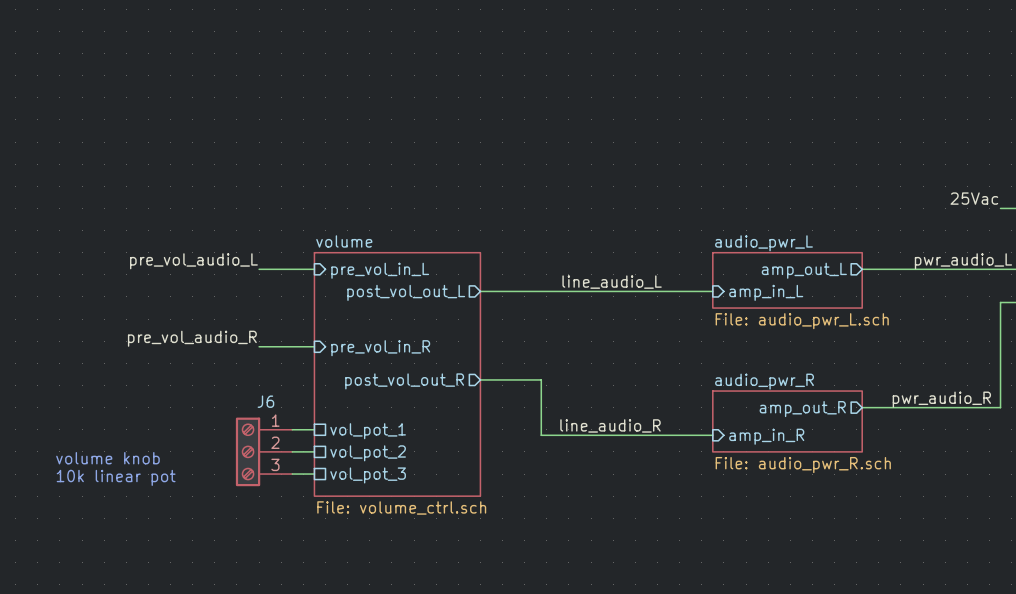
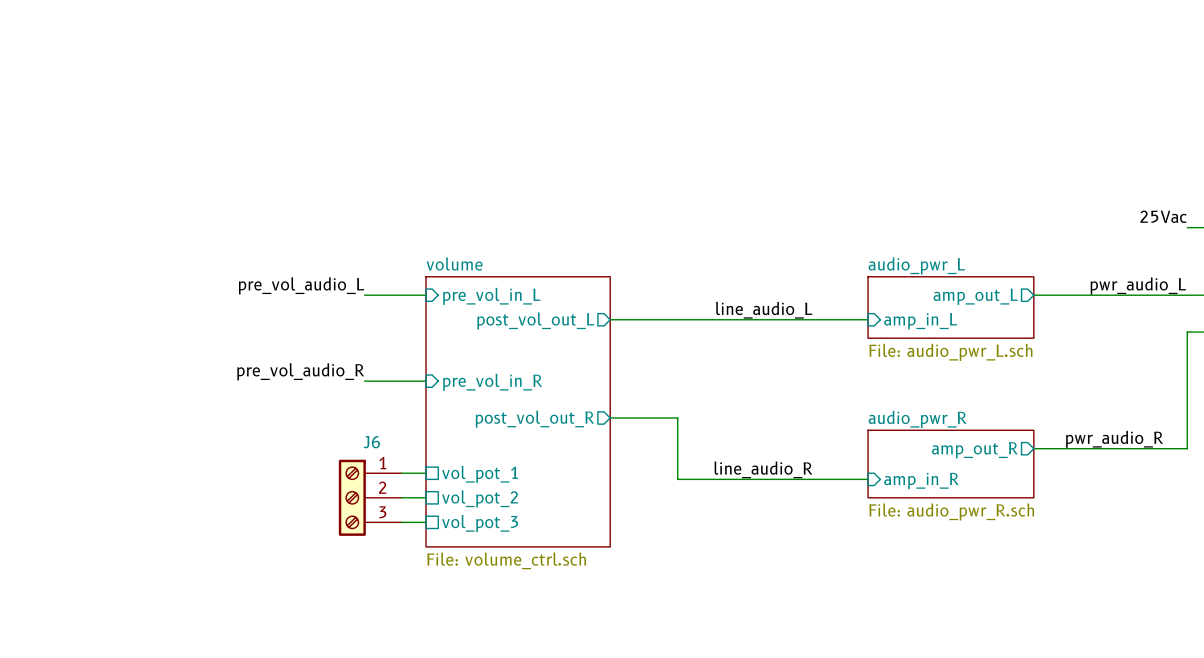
text: volume knob (107, 458) -> none
text: 10k linear pot (116, 477) -> none

